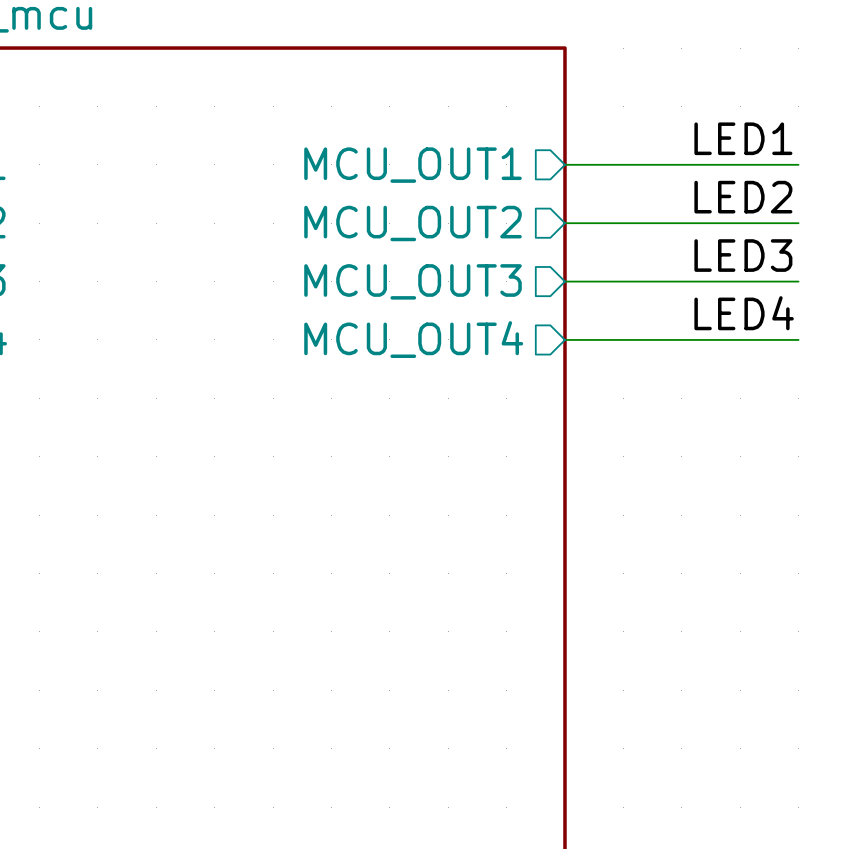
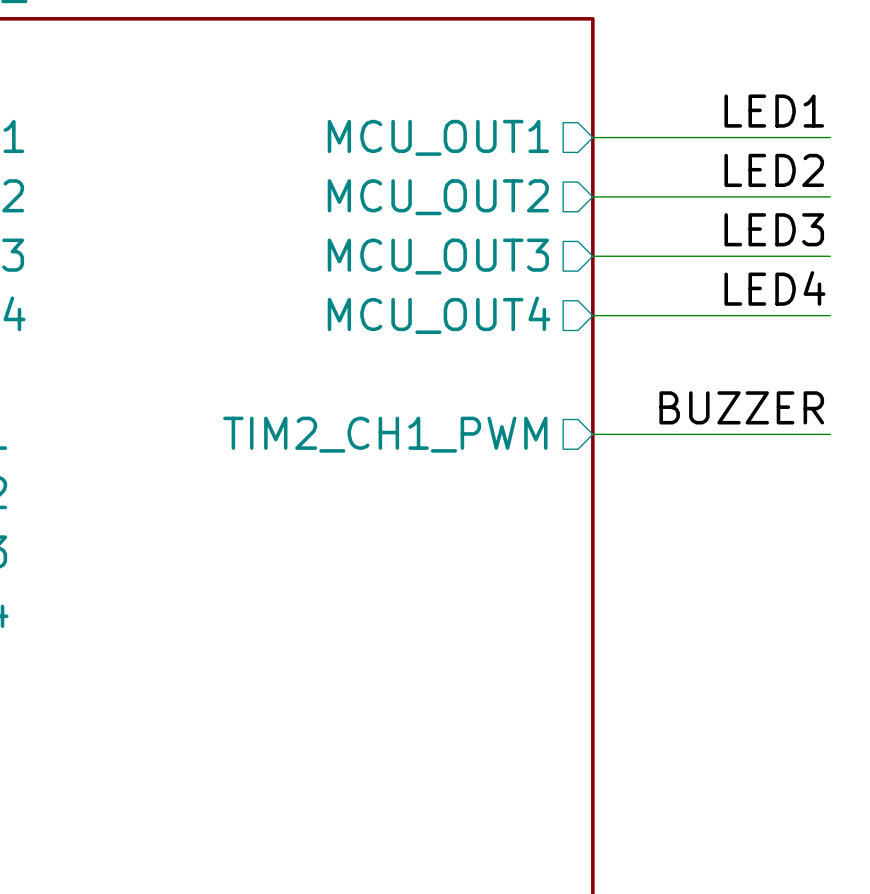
label: none -> BUZZER (741, 407)
wire: none -> (592, 434) (830, 434)
sheet pin: none -> TIM2_CH1_PWM (385, 434)

